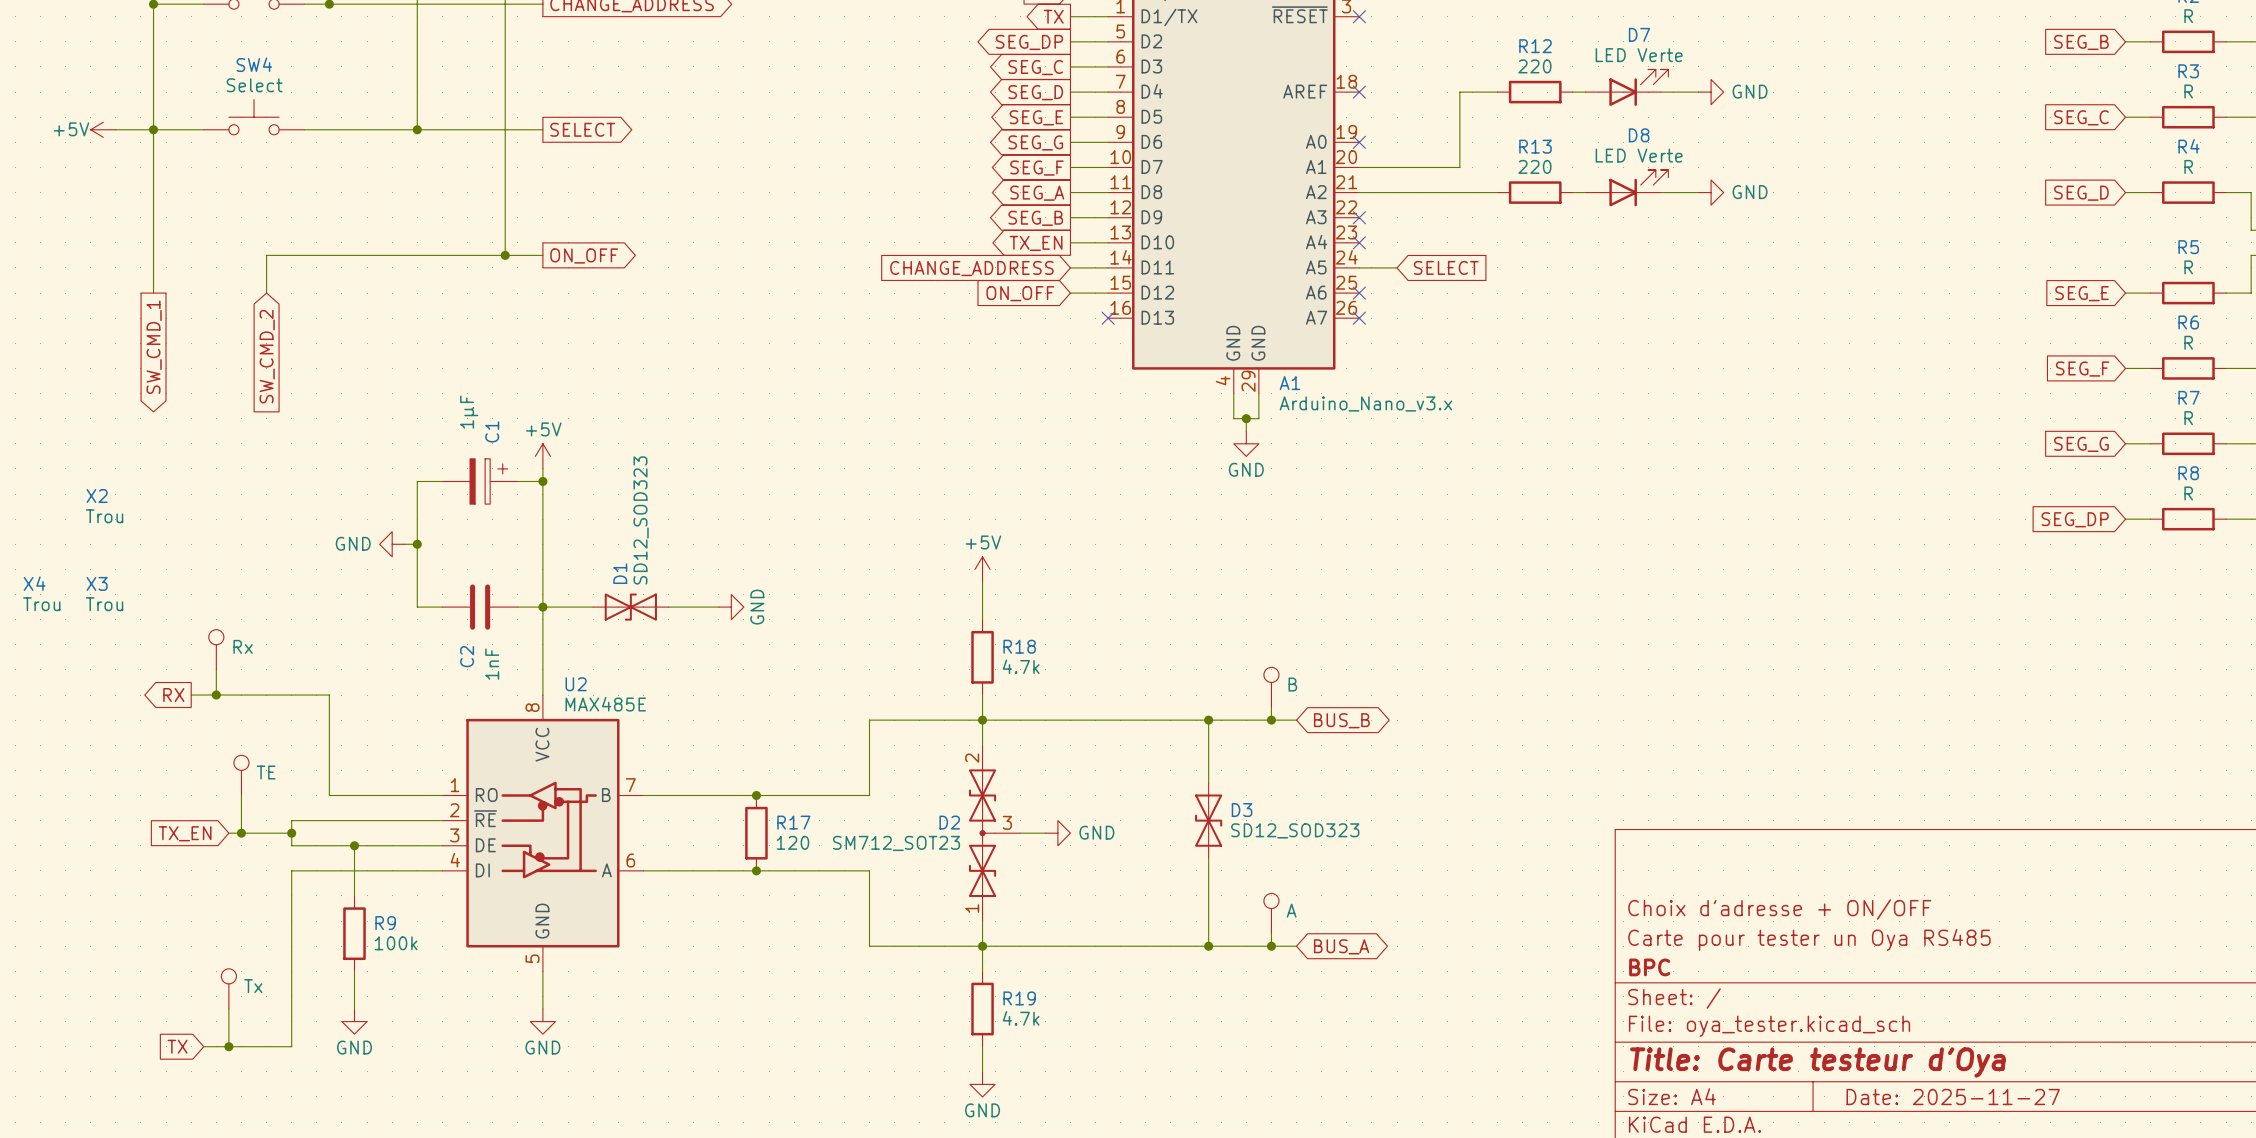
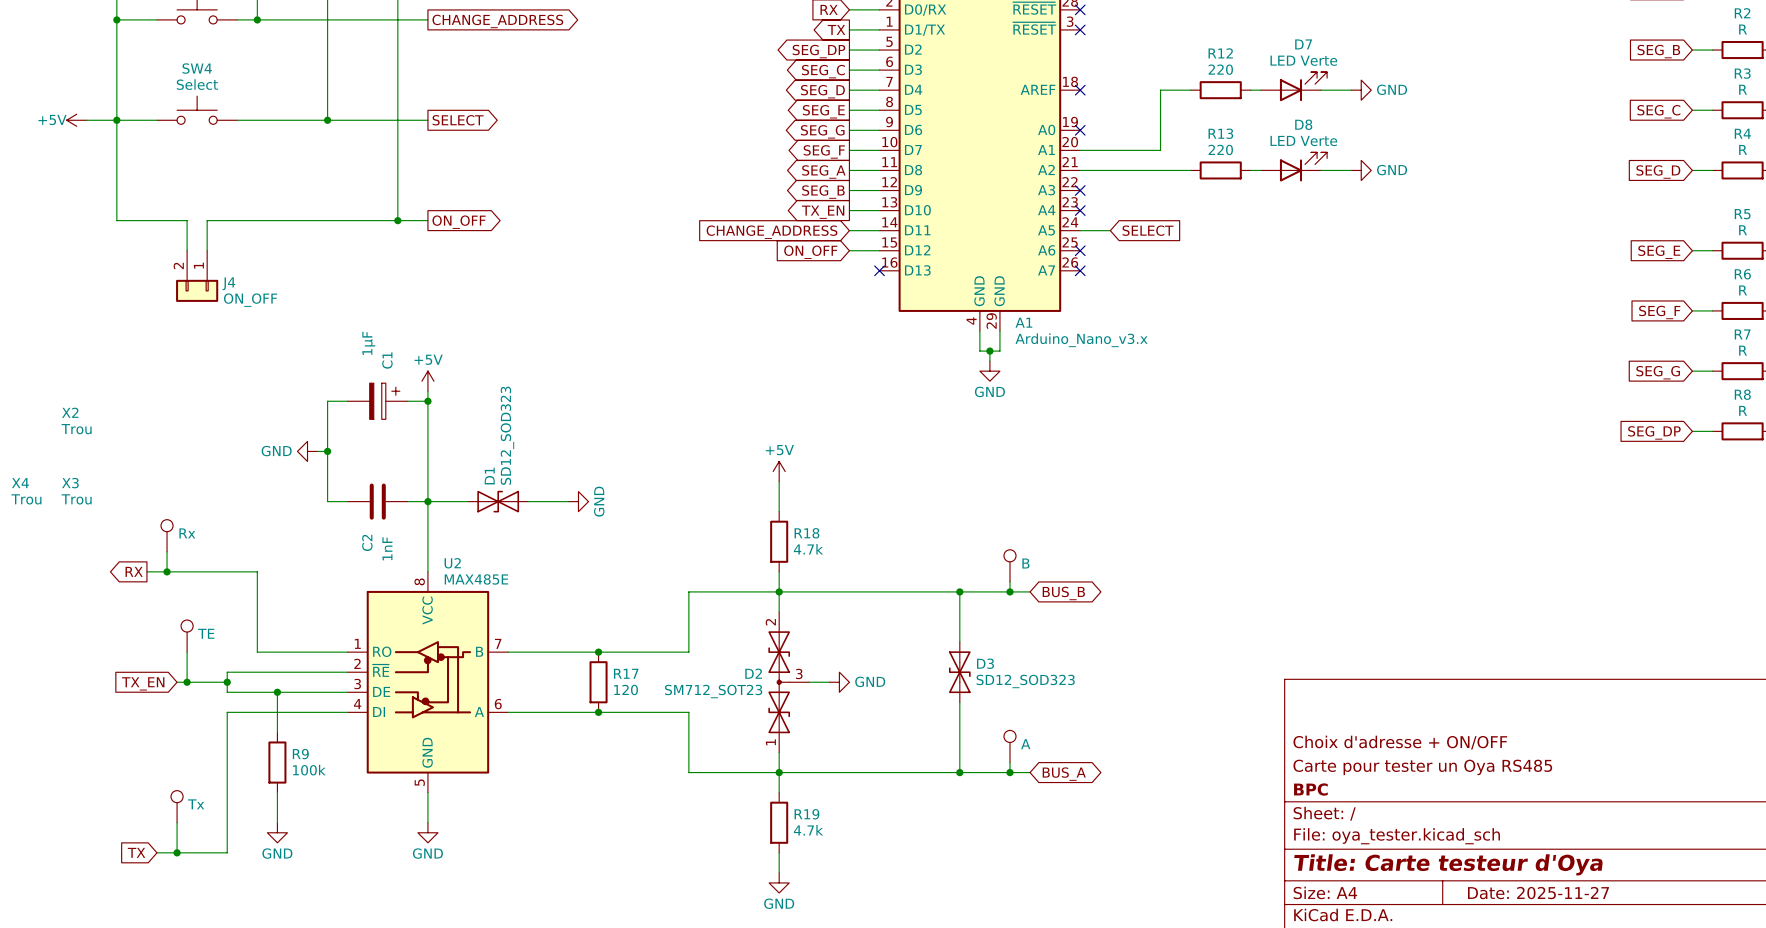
wire: (153, 255) (153, 293) -> (116, 220) (187, 220) (187, 250)
J4: none -> ON_OFF (197, 276)
global label: SW_CMD_1 (154, 347) -> none
global label: SW_CMD_2 (267, 356) -> none

